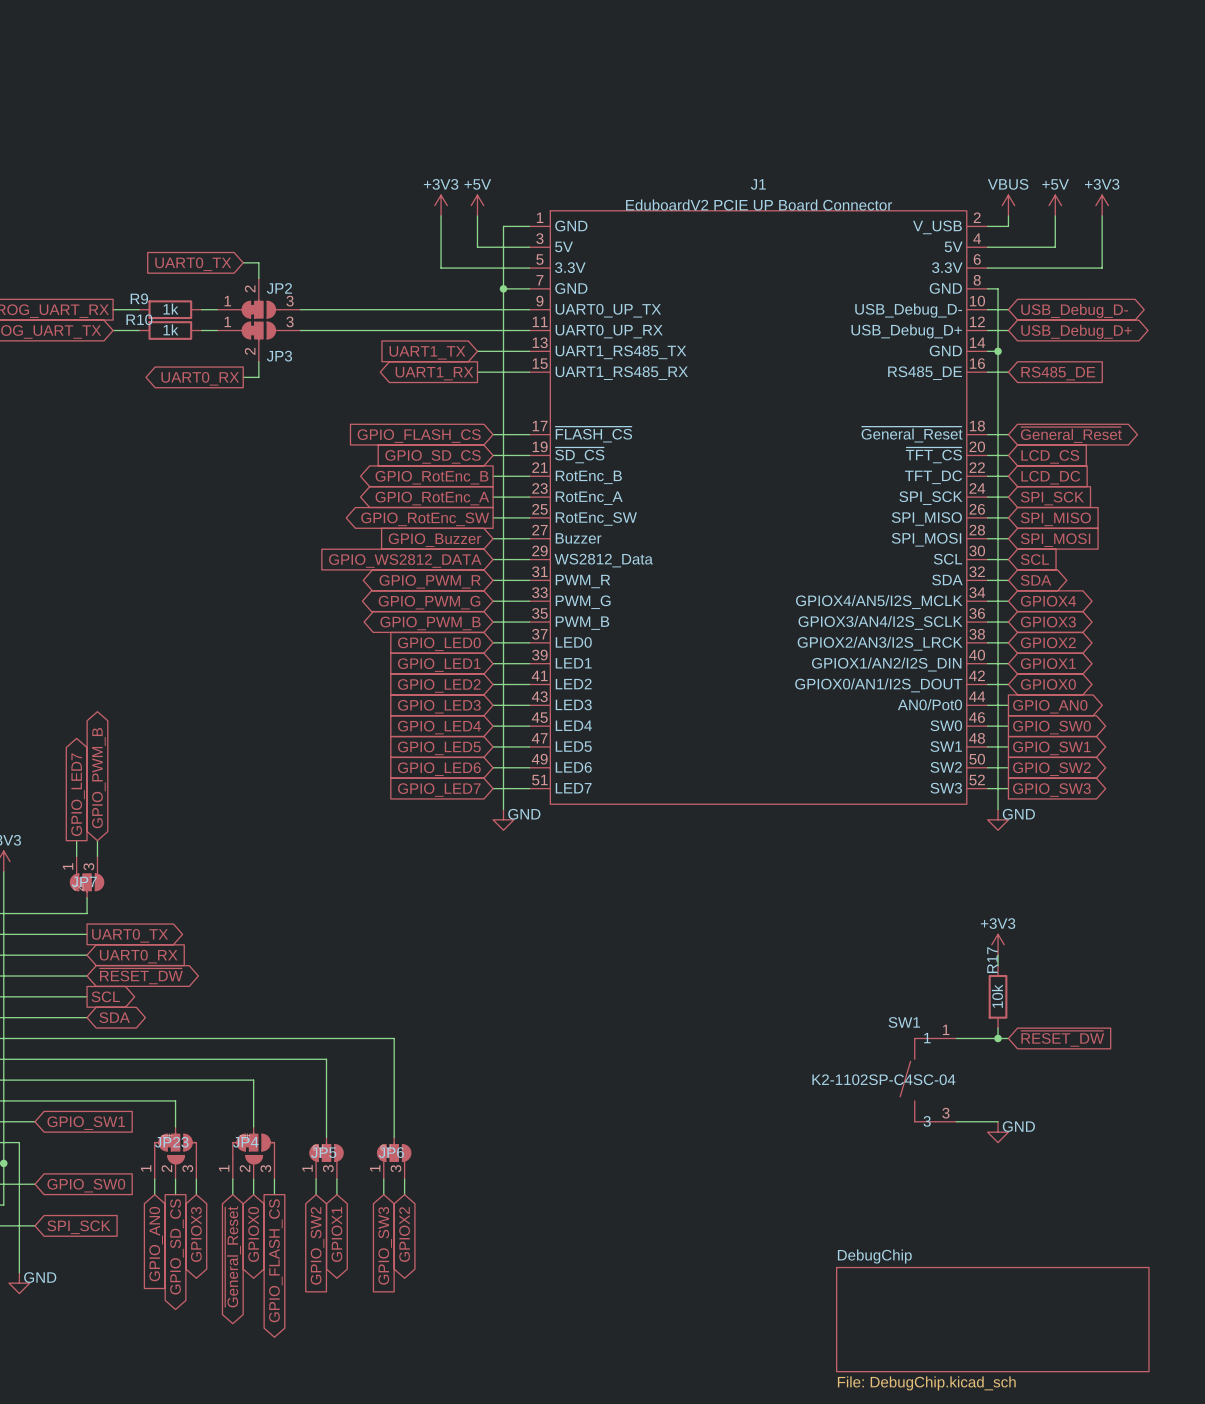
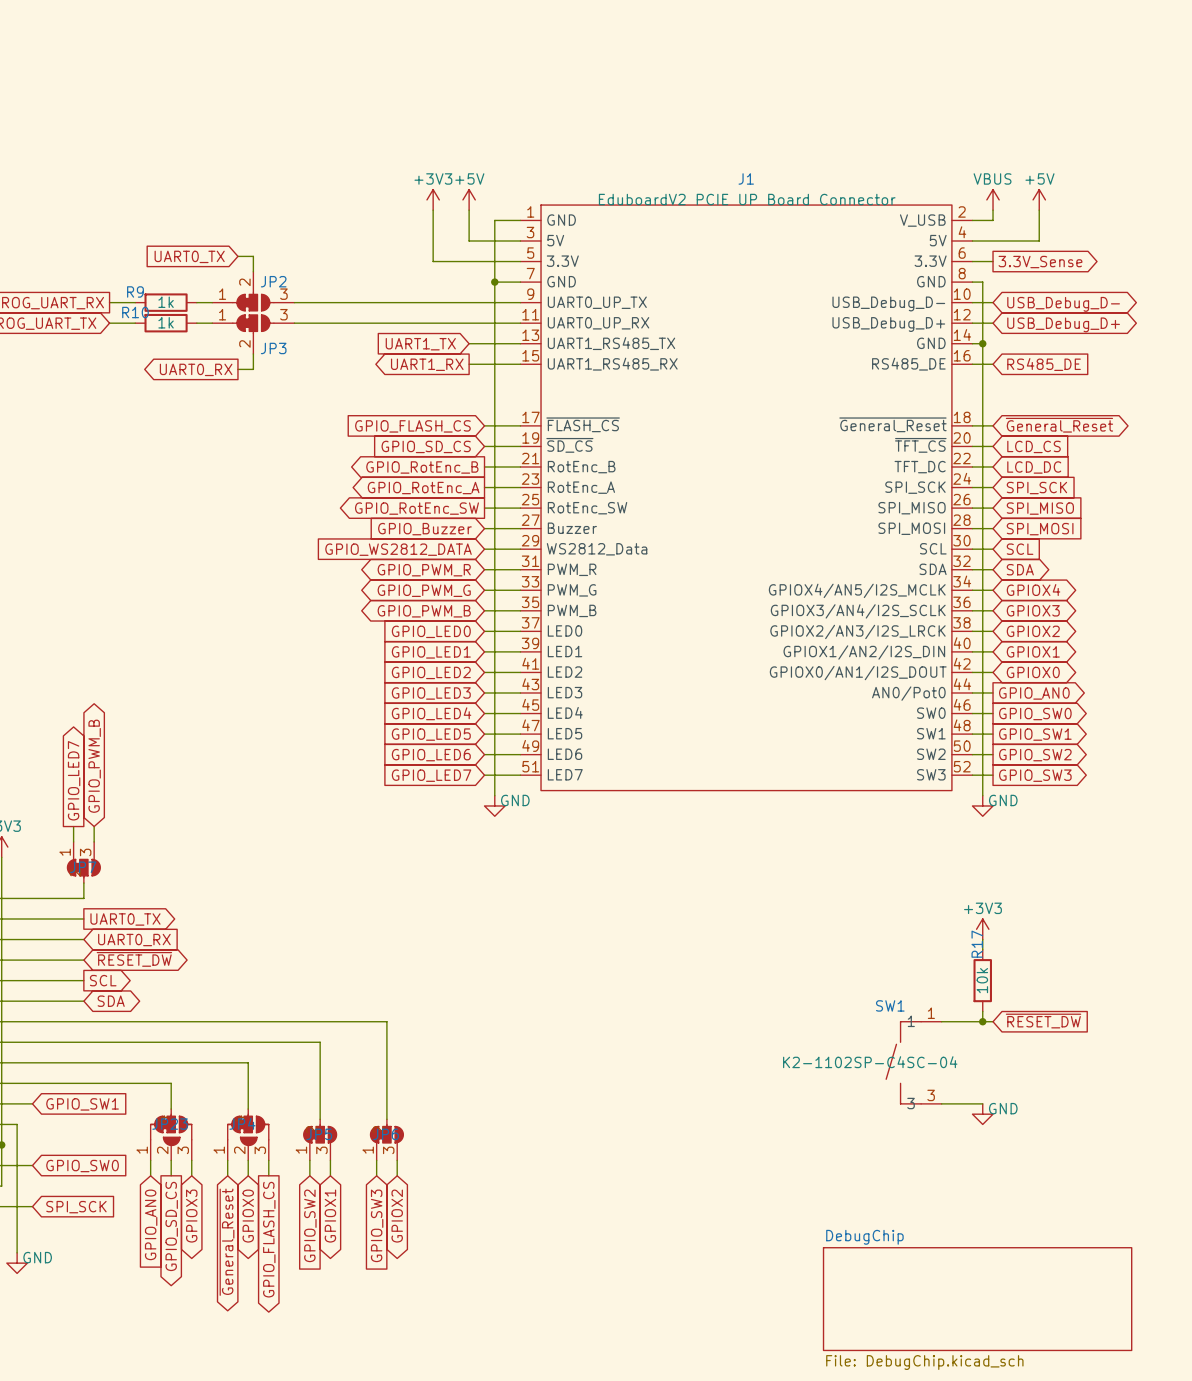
power symbol: +3V3 (1102, 205) -> none
wire: (1102, 216) (1102, 268) (1008, 268) -> none
global label: none -> 3.3V_Sense (1040, 262)

